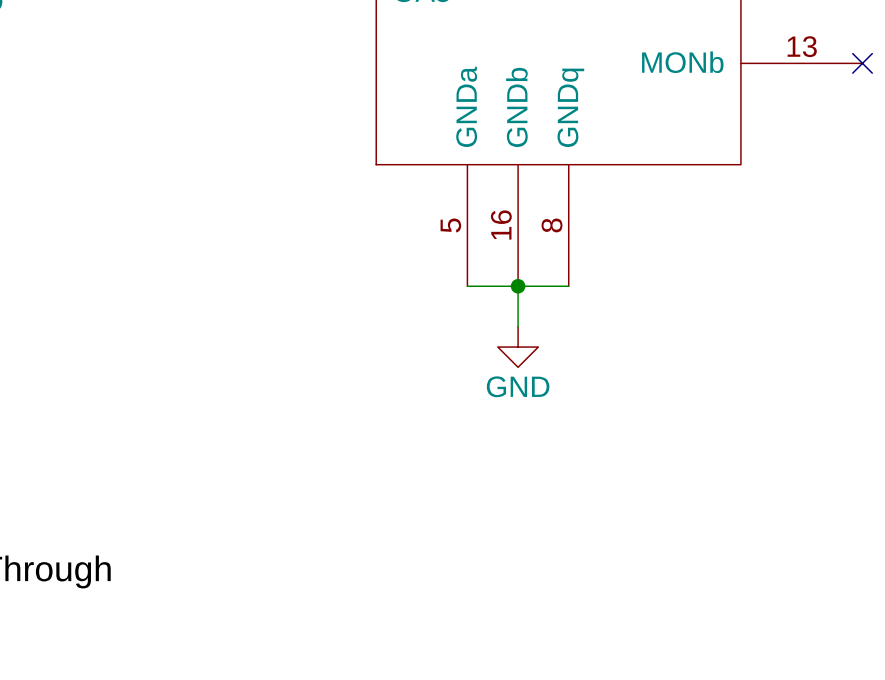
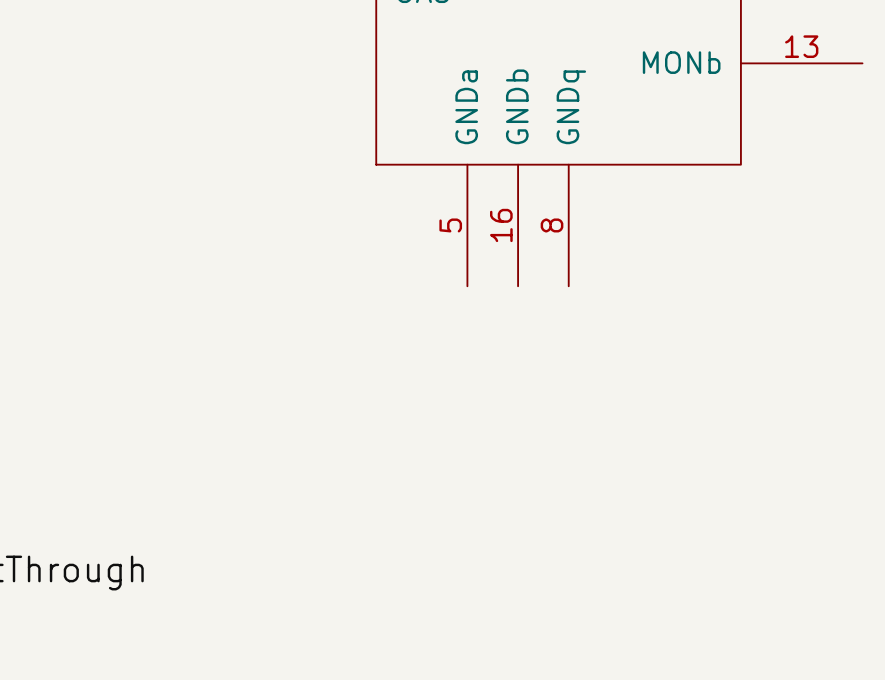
no-connect mark: (862, 63) -> none
wire: (467, 286) (568, 286) -> none
wire: (518, 286) (518, 326) -> none
junction: (518, 286) -> none
power symbol: GND (518, 347) -> none

